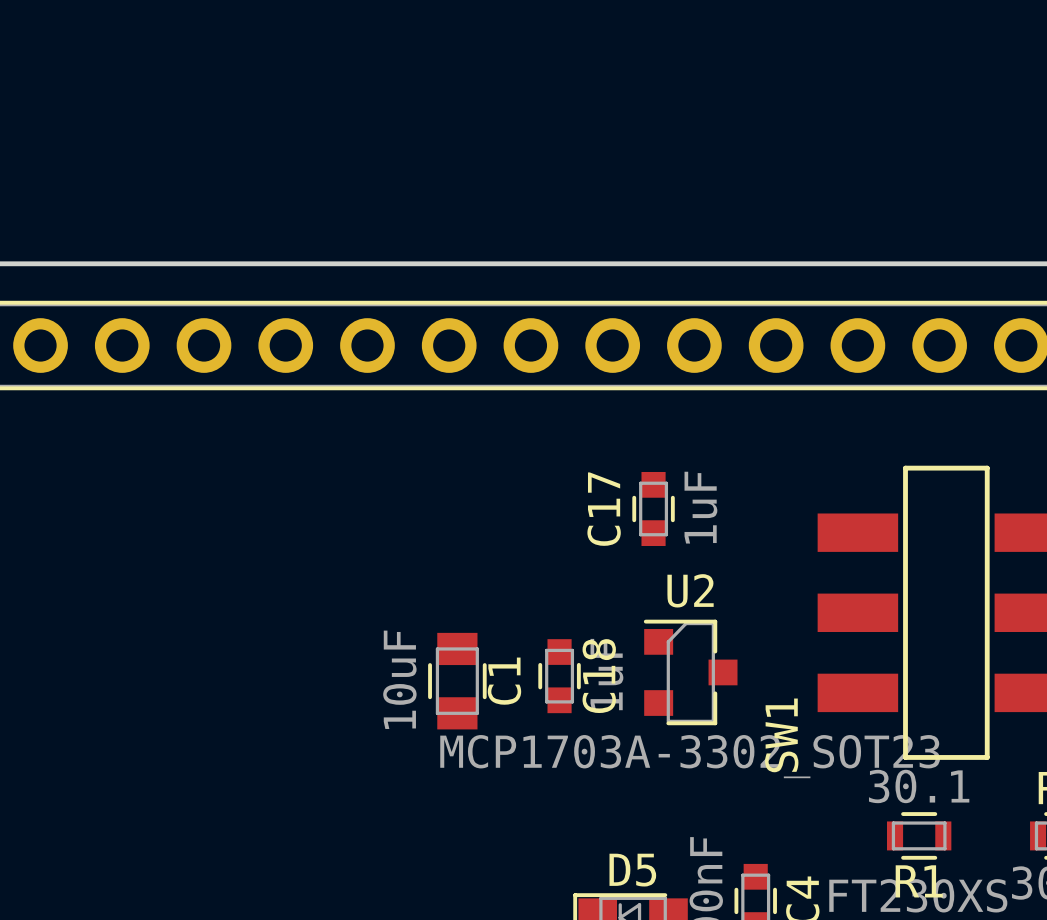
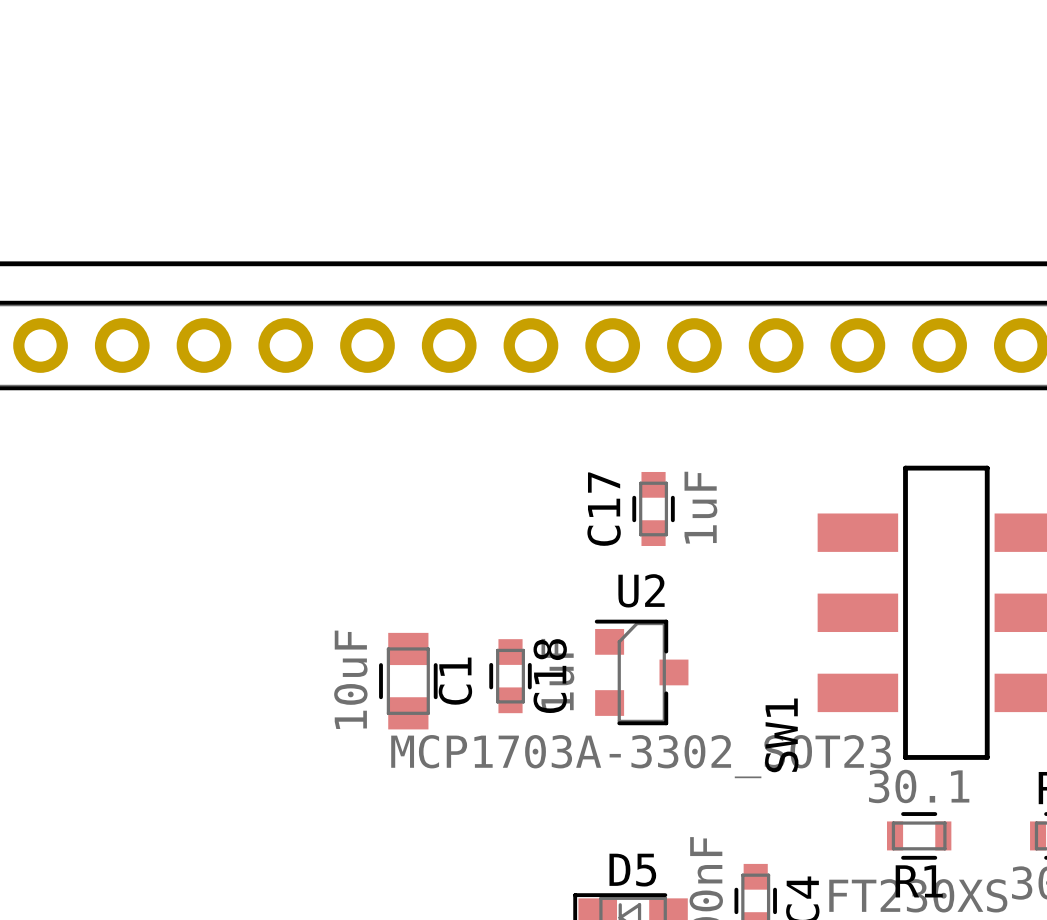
U2 position: (690, 672) -> (641, 672)
C18 position: (559, 676) -> (510, 676)
C1 position: (457, 681) -> (408, 681)

